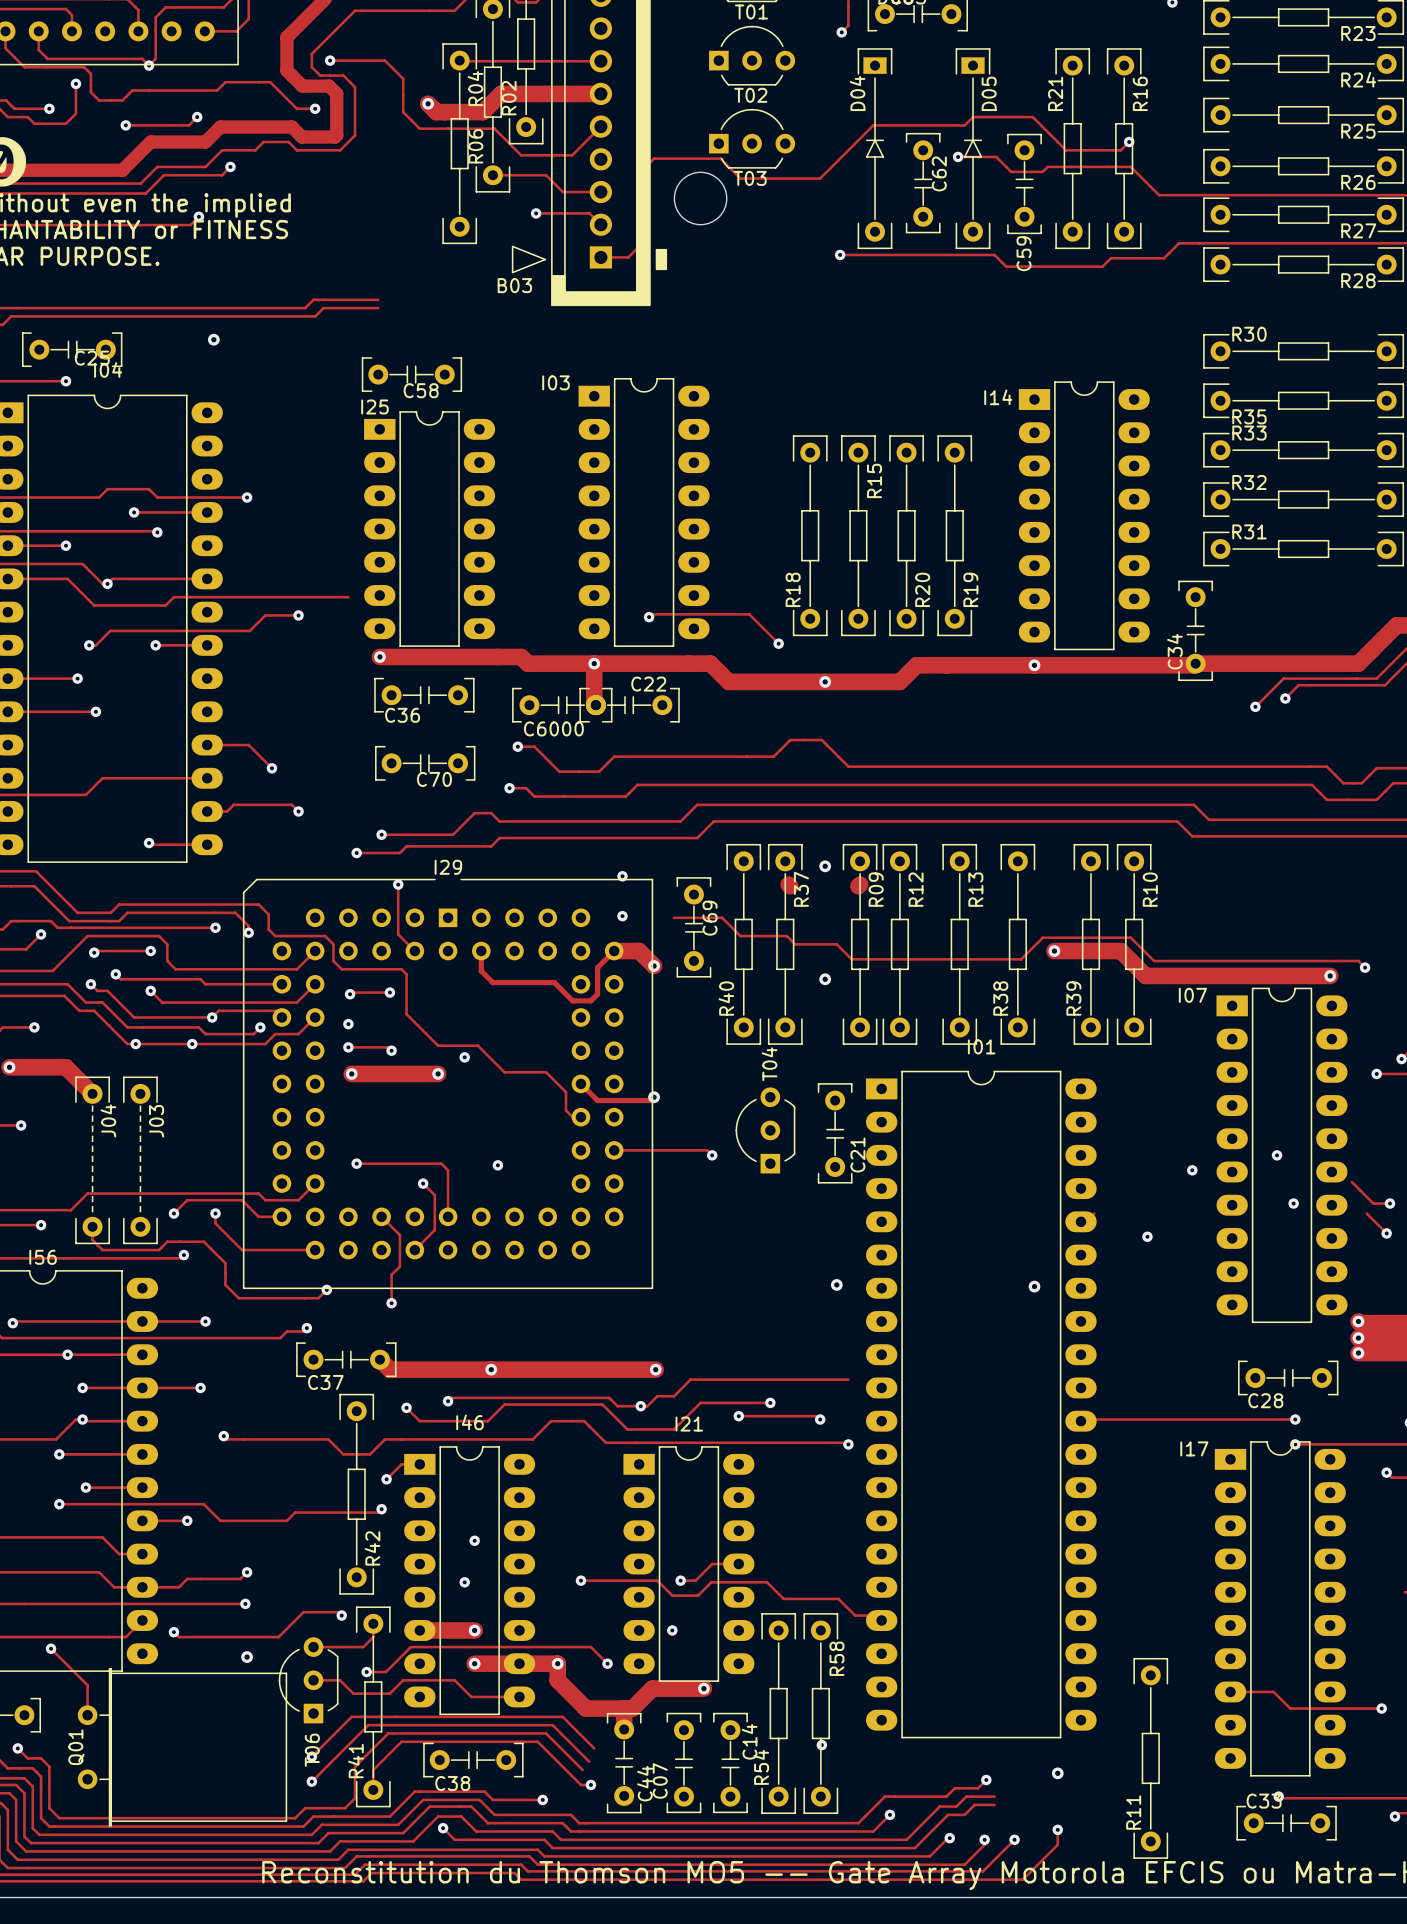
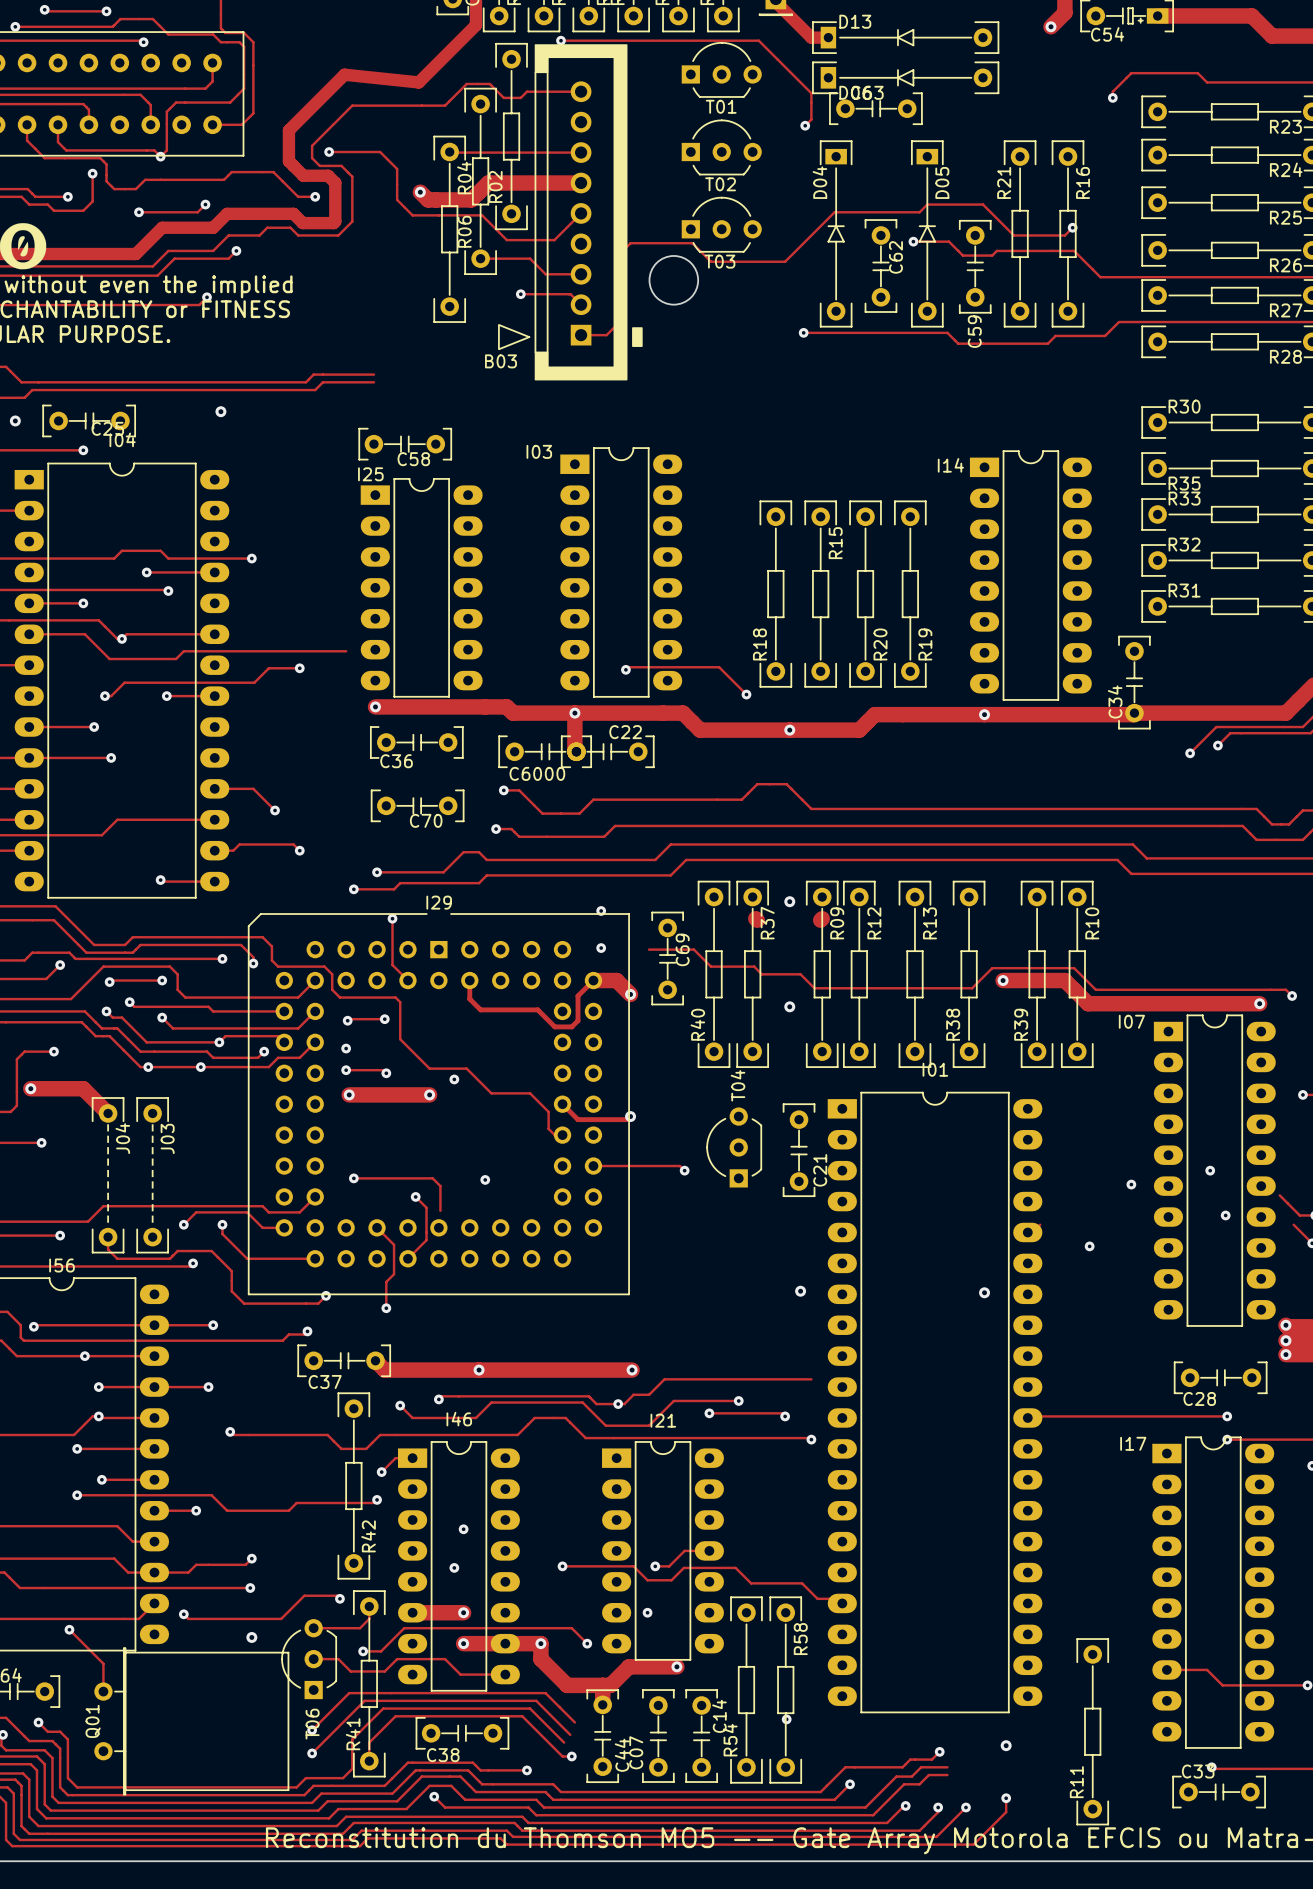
track: (448, 1170) (448, 1216) -> (438, 1184) (440, 1210)

